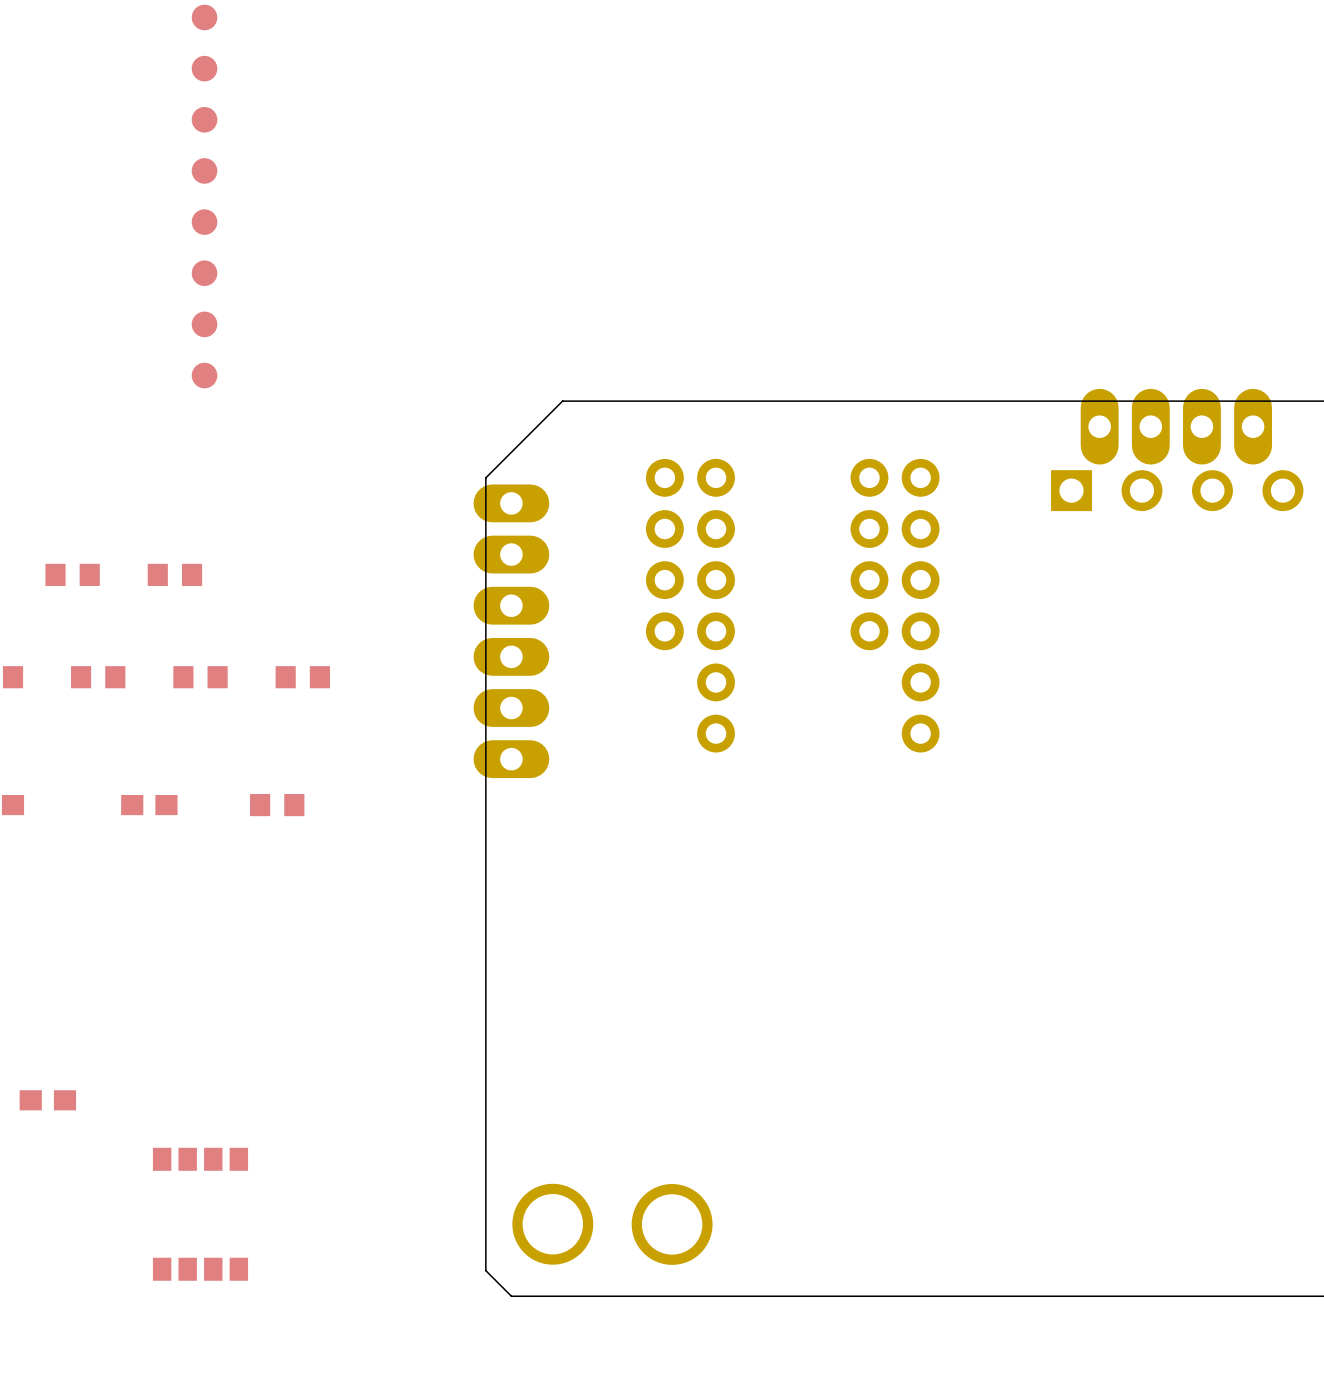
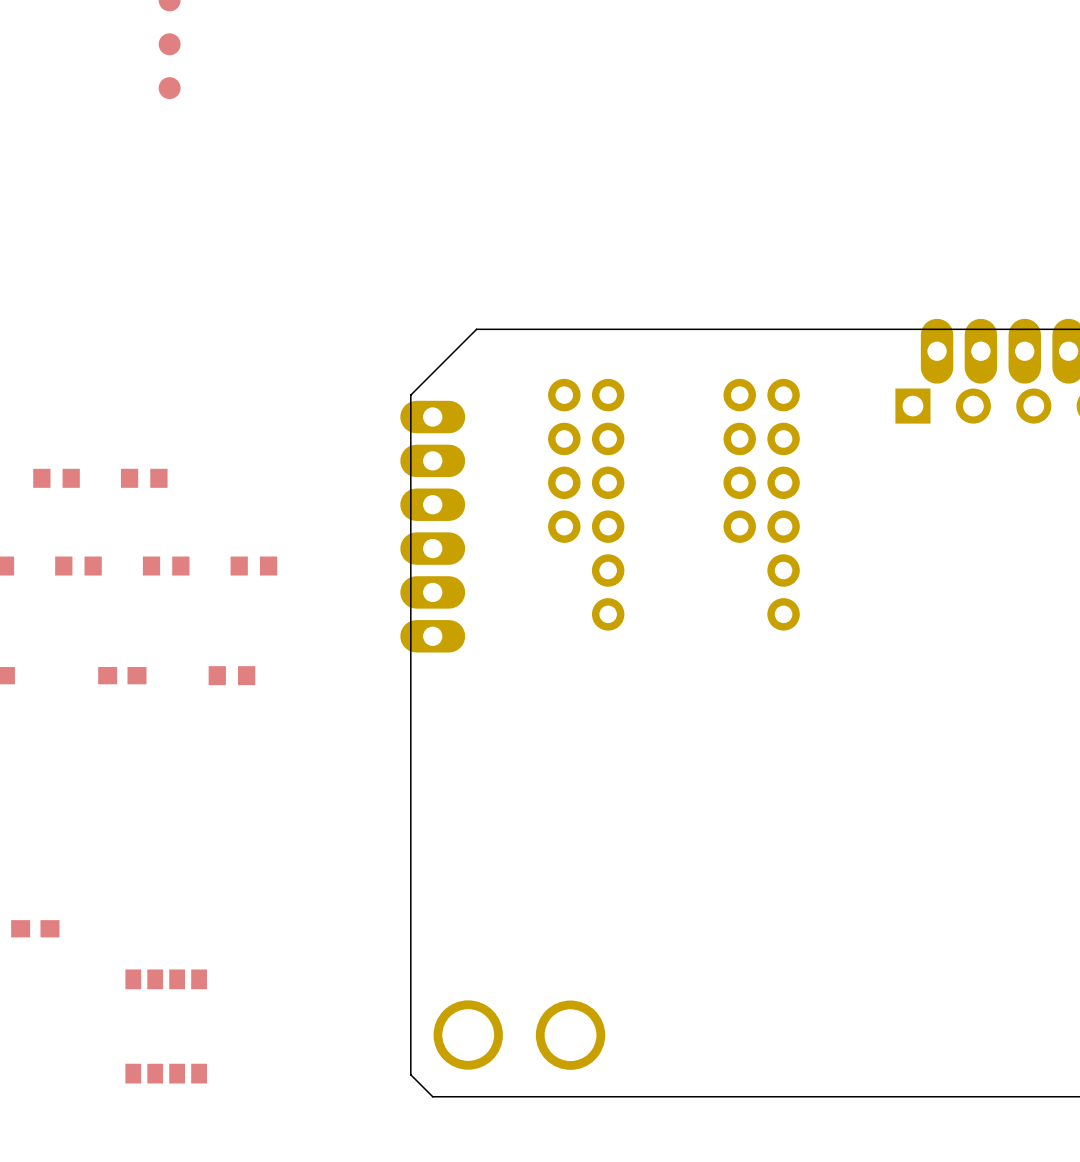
part: (204, 170) -> none
part: (204, 222) -> none
part: (204, 273) -> none
part: (204, 324) -> none
part: (204, 375) -> none

